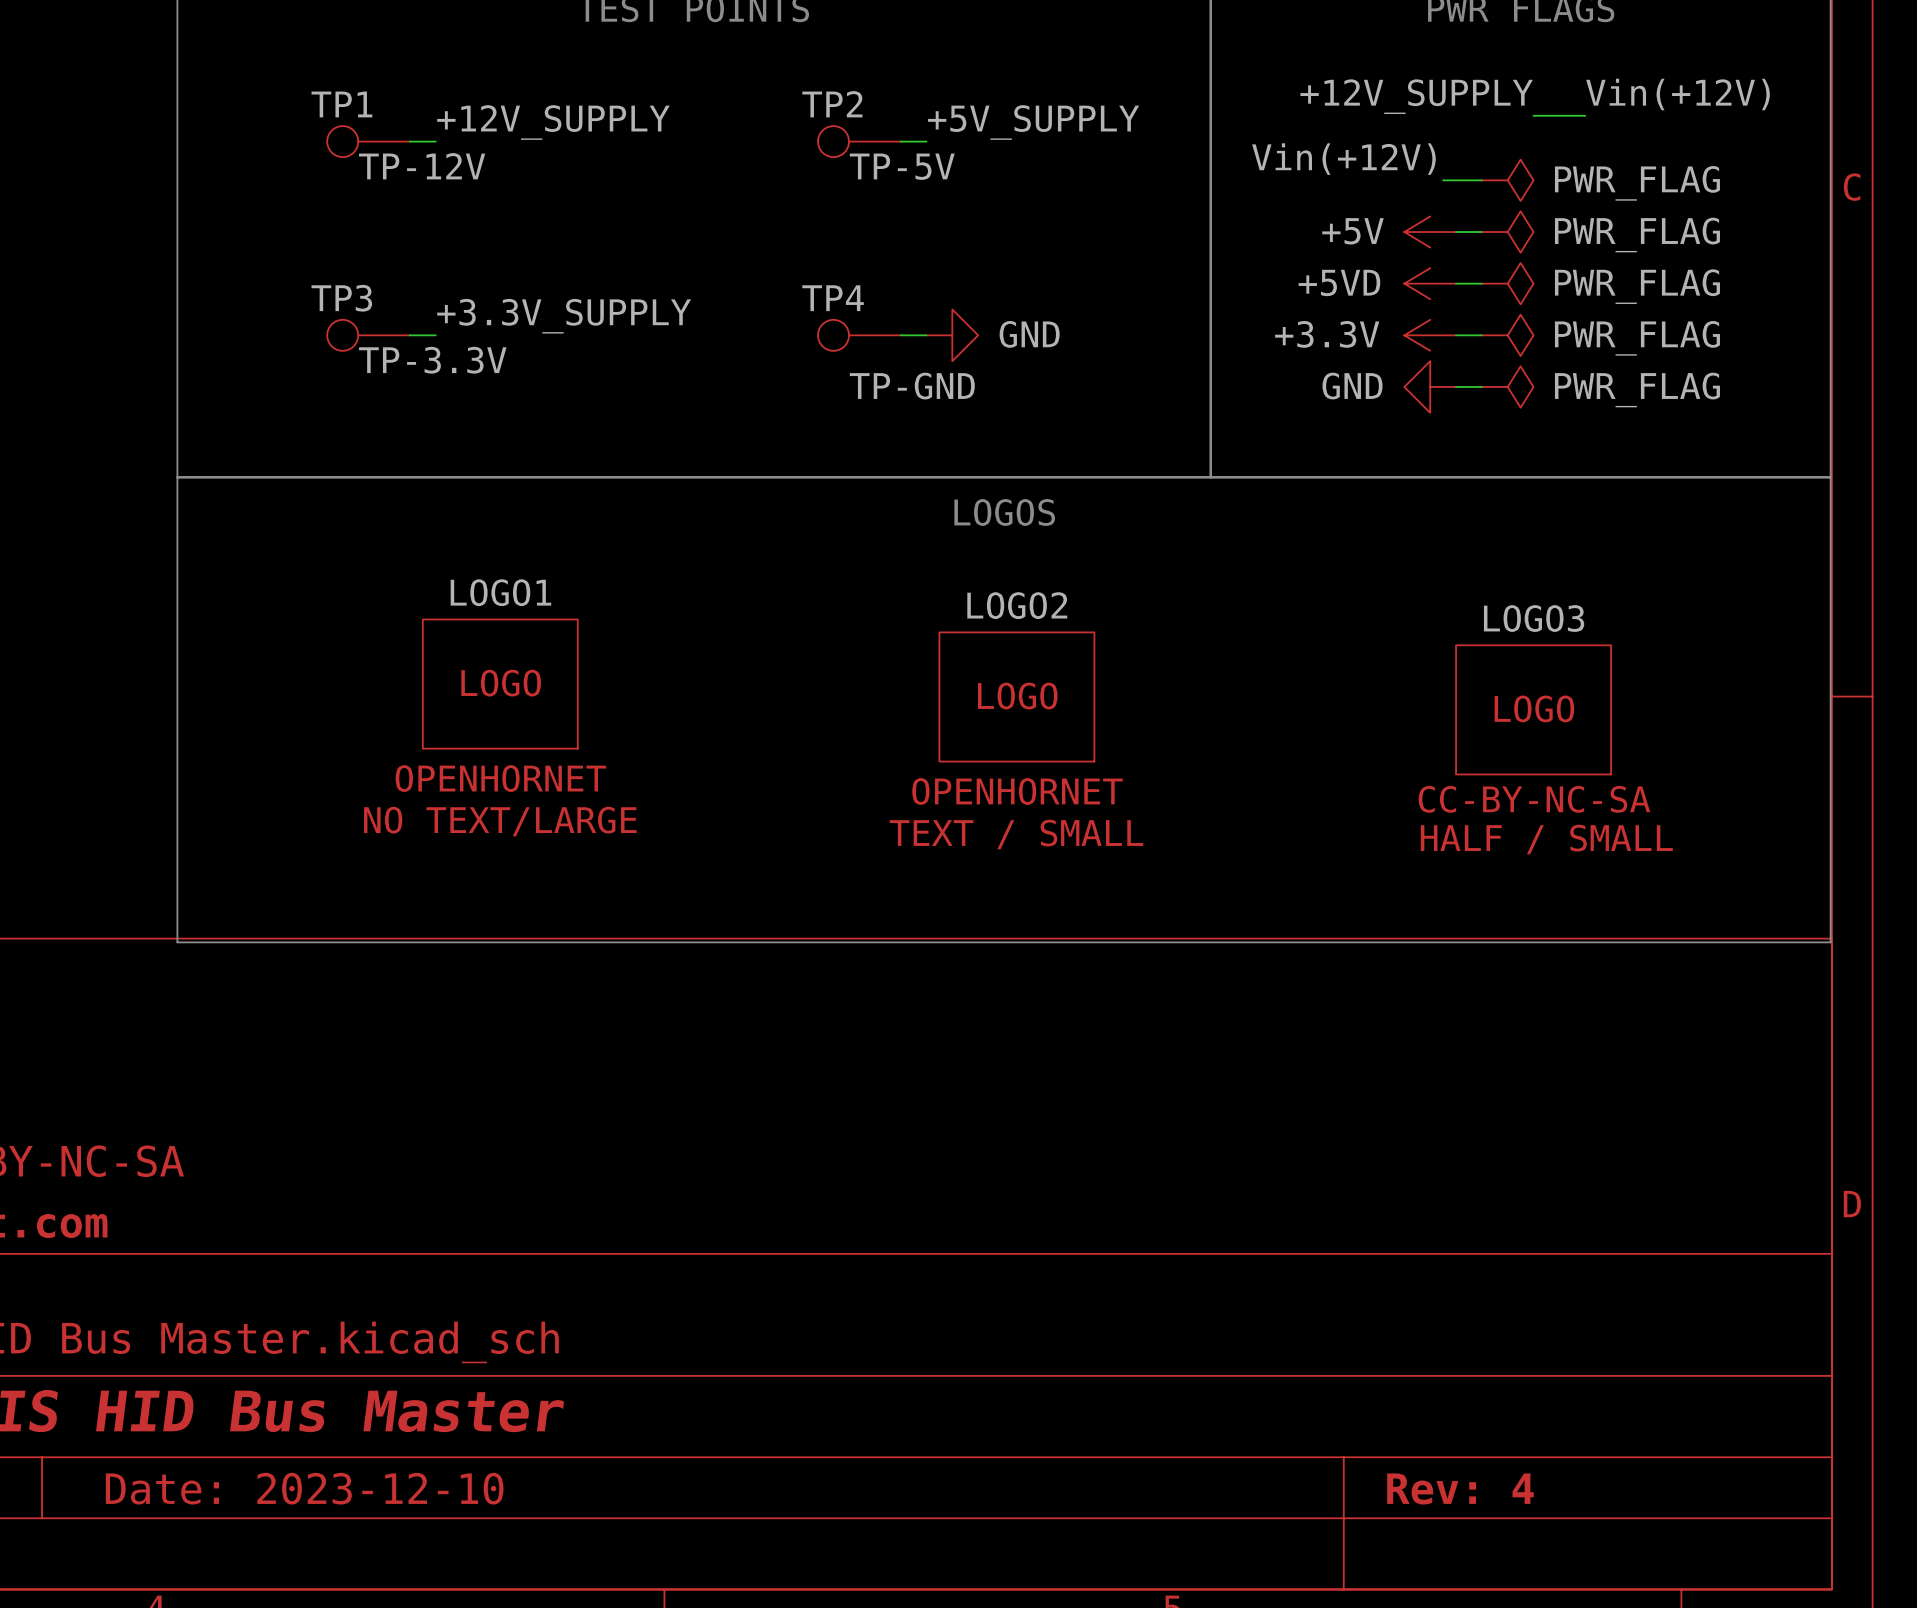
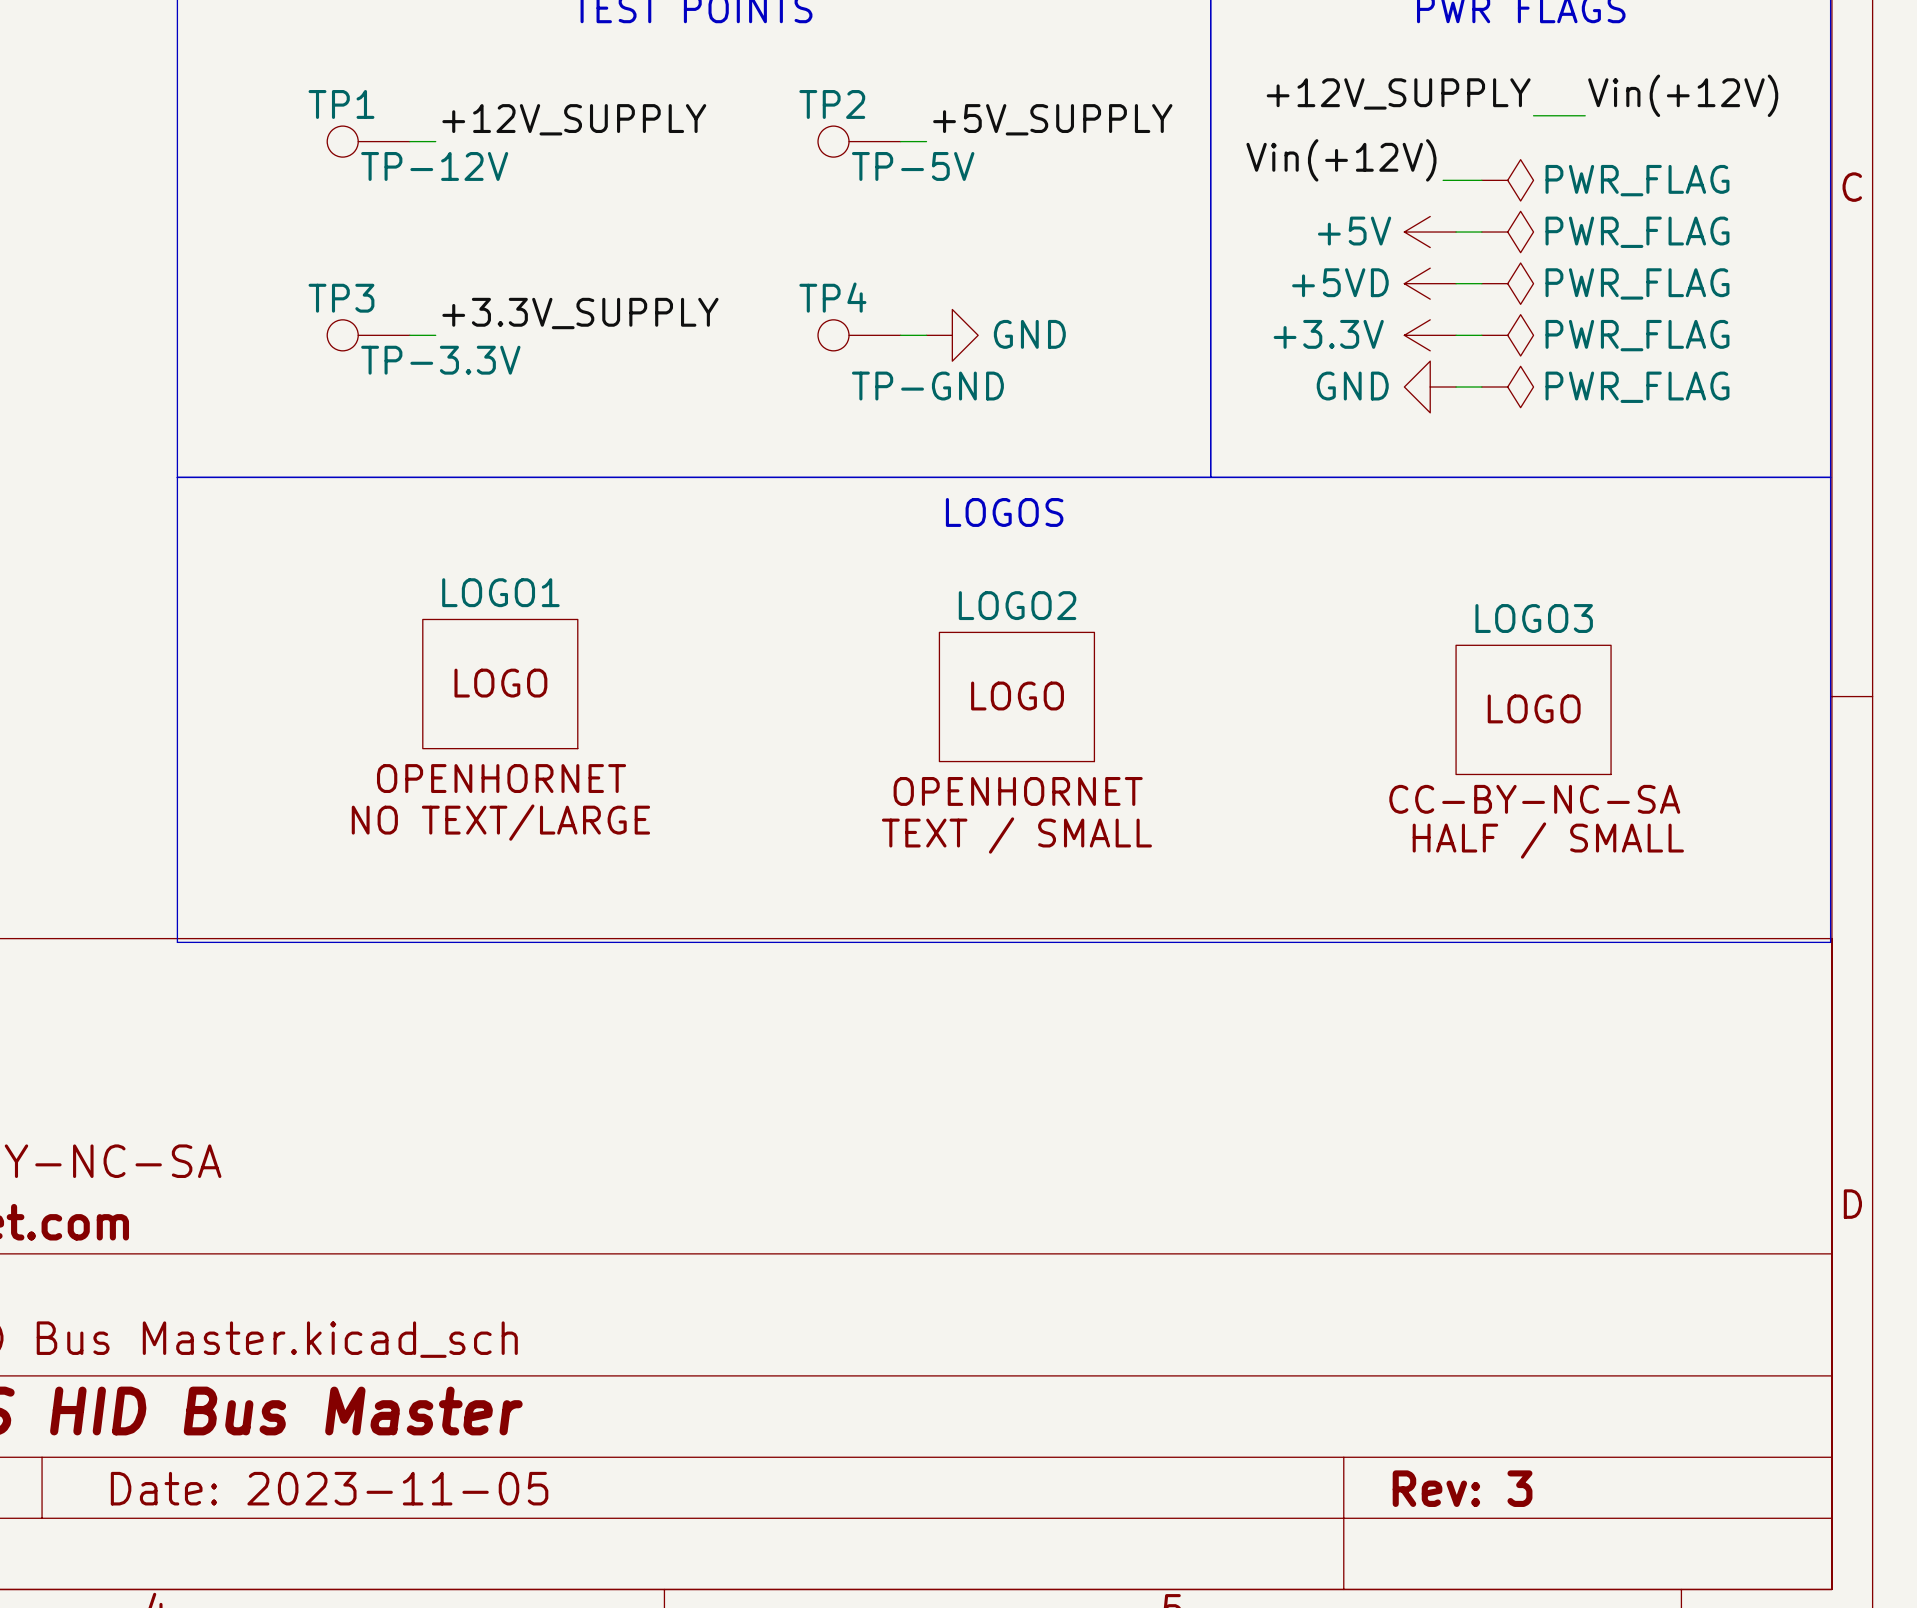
title block: Date: 2023-12-10 (304, 1488) -> Date: 2023-11-05 (329, 1488)
title block: Rev: 4 (1460, 1488) -> Rev: 3 (1462, 1488)

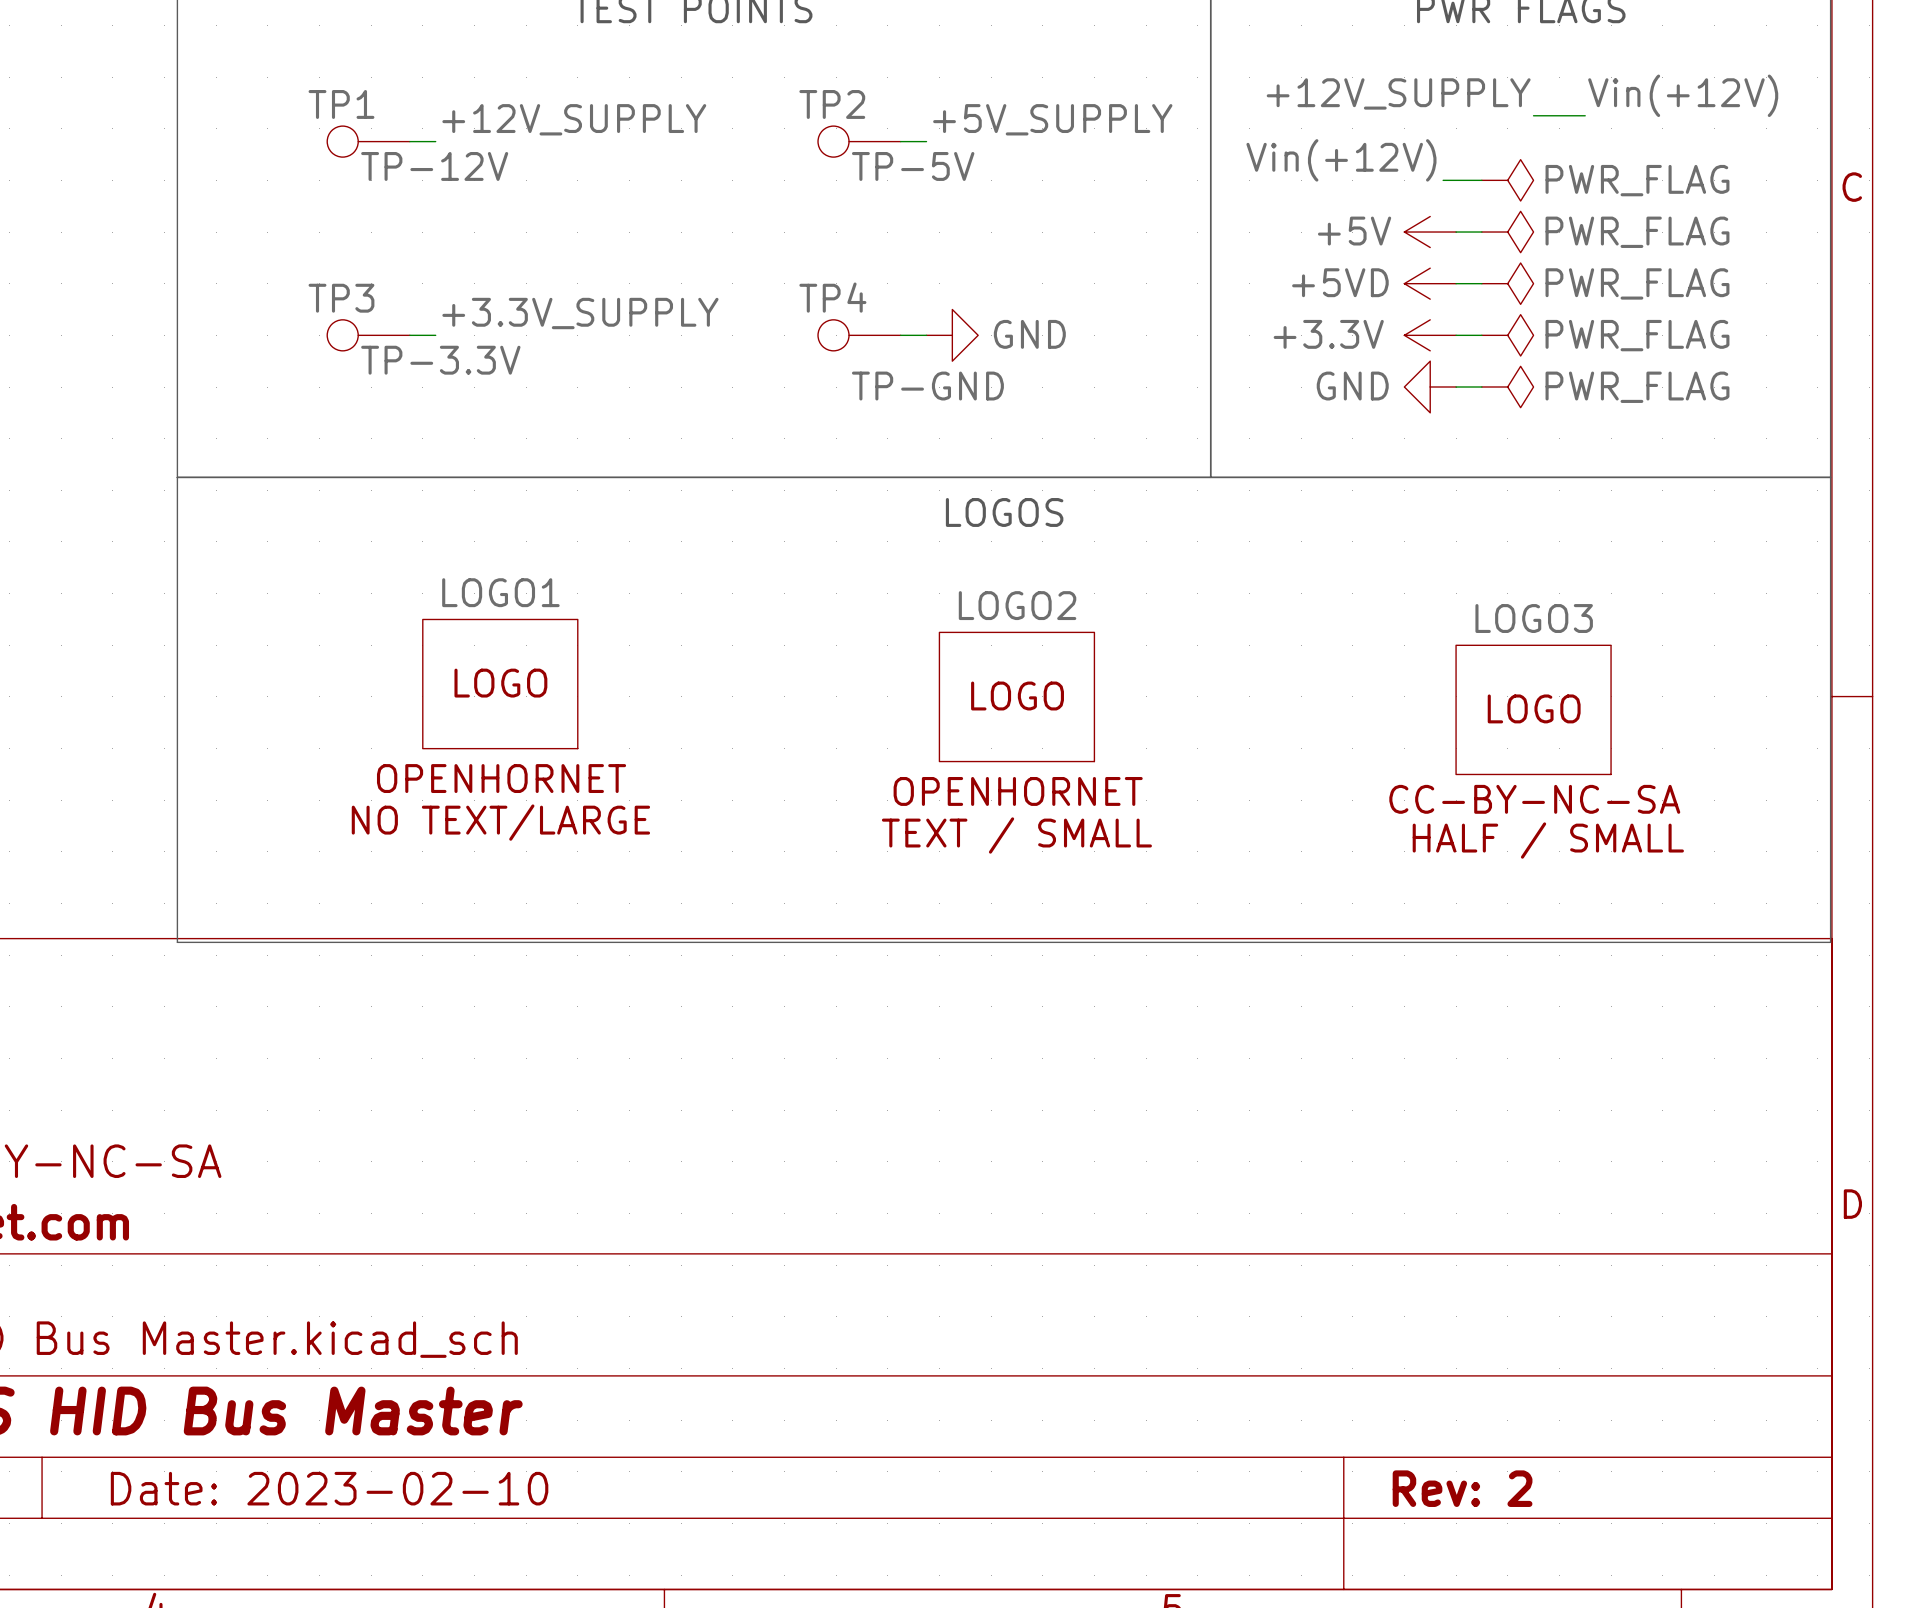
title block: Date: 2023-11-05 (329, 1488) -> Date: 2023-02-10 (329, 1488)
title block: Rev: 3 (1462, 1488) -> Rev: 2 (1462, 1488)

